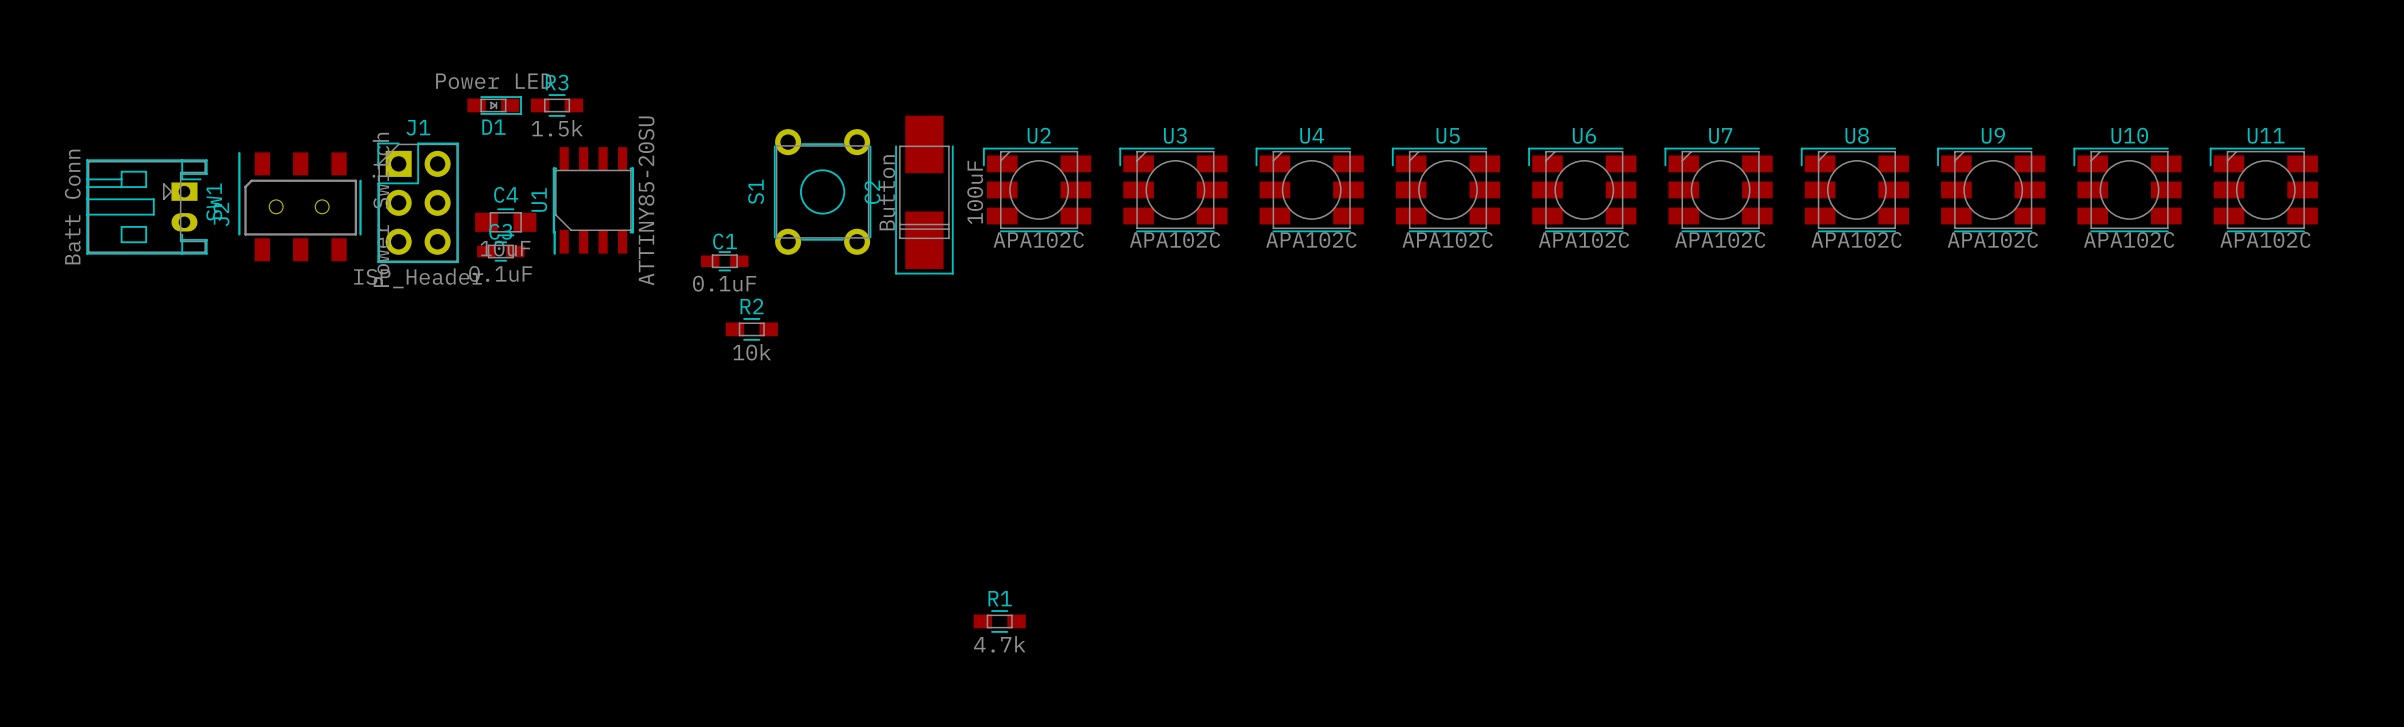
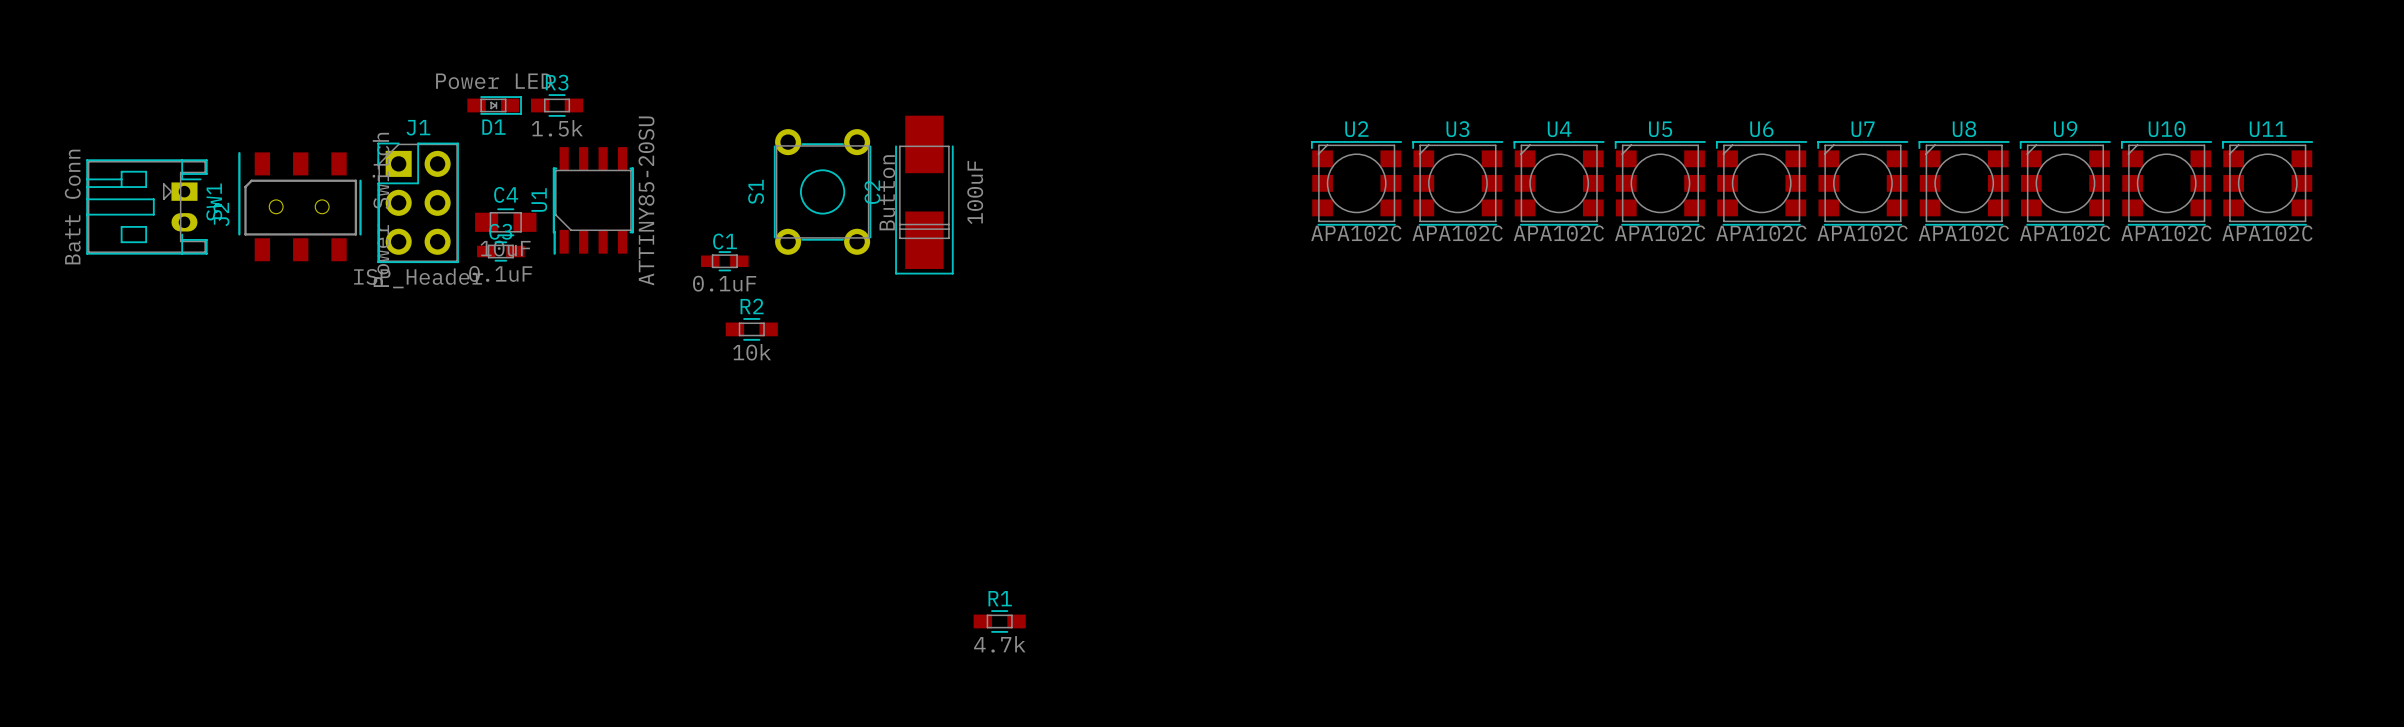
U2 footprint: [982, 147, 1092, 233] -> [1310, 141, 1403, 226]
U3 footprint: [1119, 147, 1228, 233] -> [1412, 141, 1504, 226]
U4 footprint: [1255, 147, 1364, 233] -> [1513, 141, 1605, 226]
U5 footprint: [1391, 147, 1501, 233] -> [1614, 141, 1706, 226]
U6 footprint: [1528, 147, 1637, 233] -> [1715, 141, 1808, 226]
U7 footprint: [1664, 147, 1773, 233] -> [1817, 141, 1909, 226]
U8 footprint: [1800, 147, 1910, 233] -> [1918, 141, 2010, 226]
U9 footprint: [1937, 147, 2046, 233] -> [2019, 141, 2111, 226]
U10 footprint: [2073, 147, 2182, 233] -> [2121, 141, 2213, 226]
U11 footprint: [2209, 147, 2318, 233] -> [2222, 141, 2314, 226]

